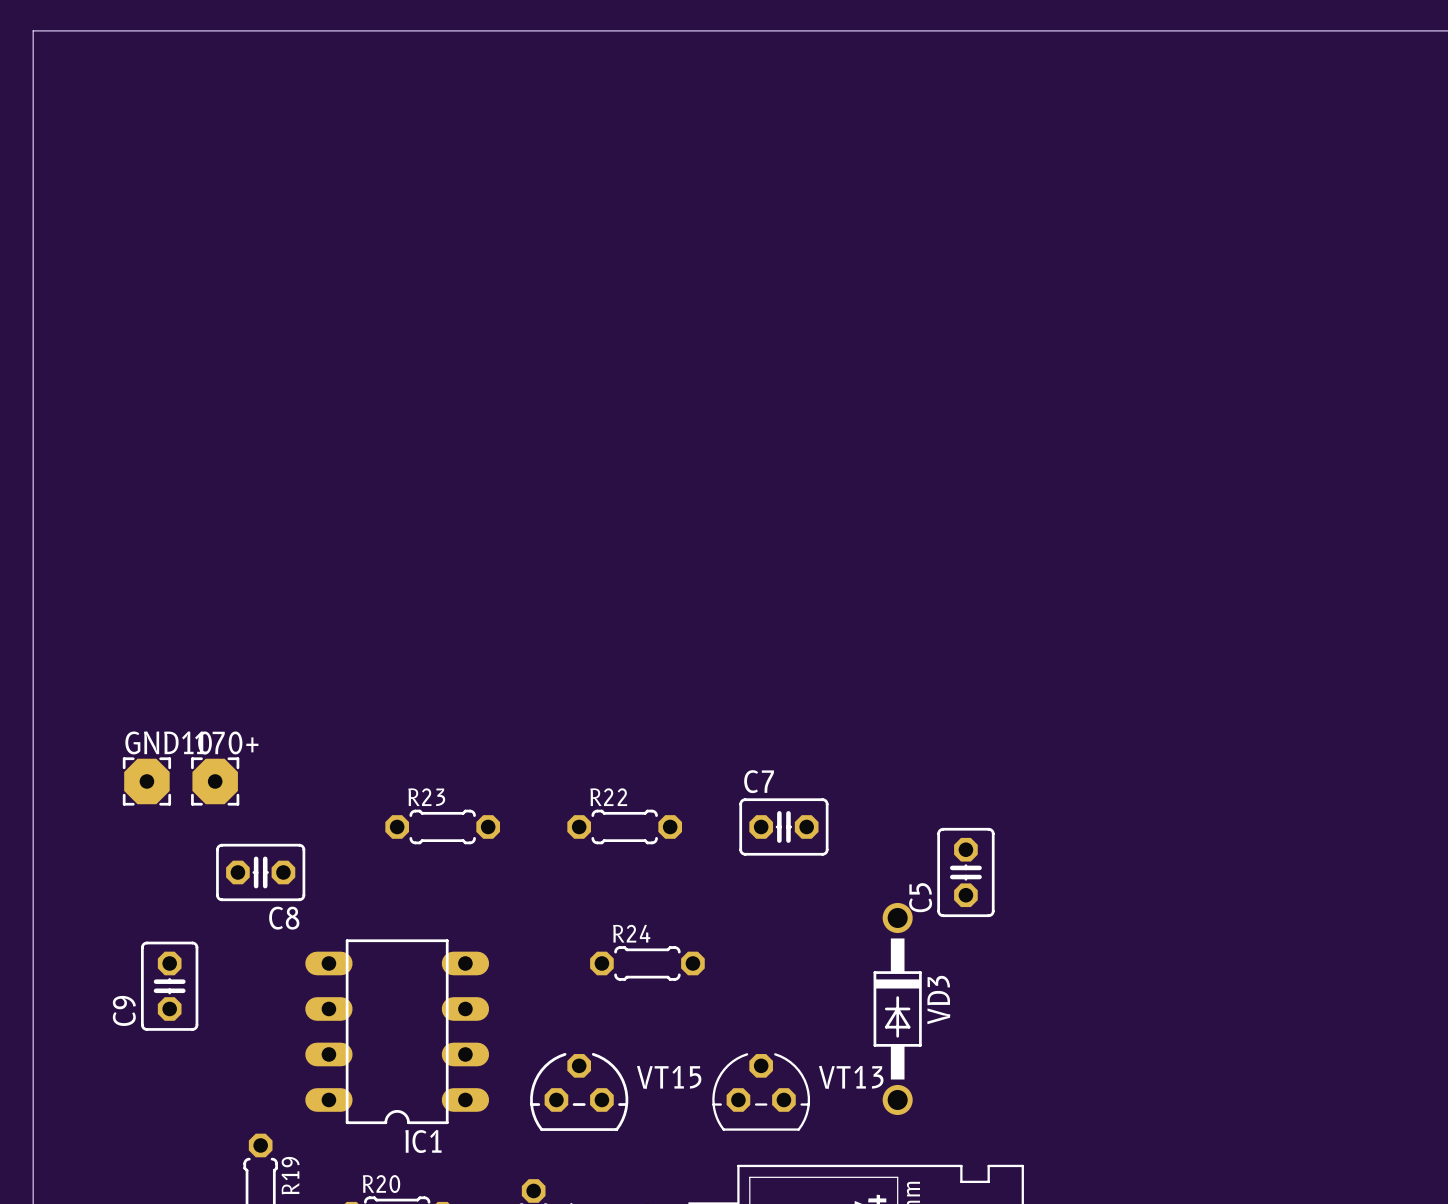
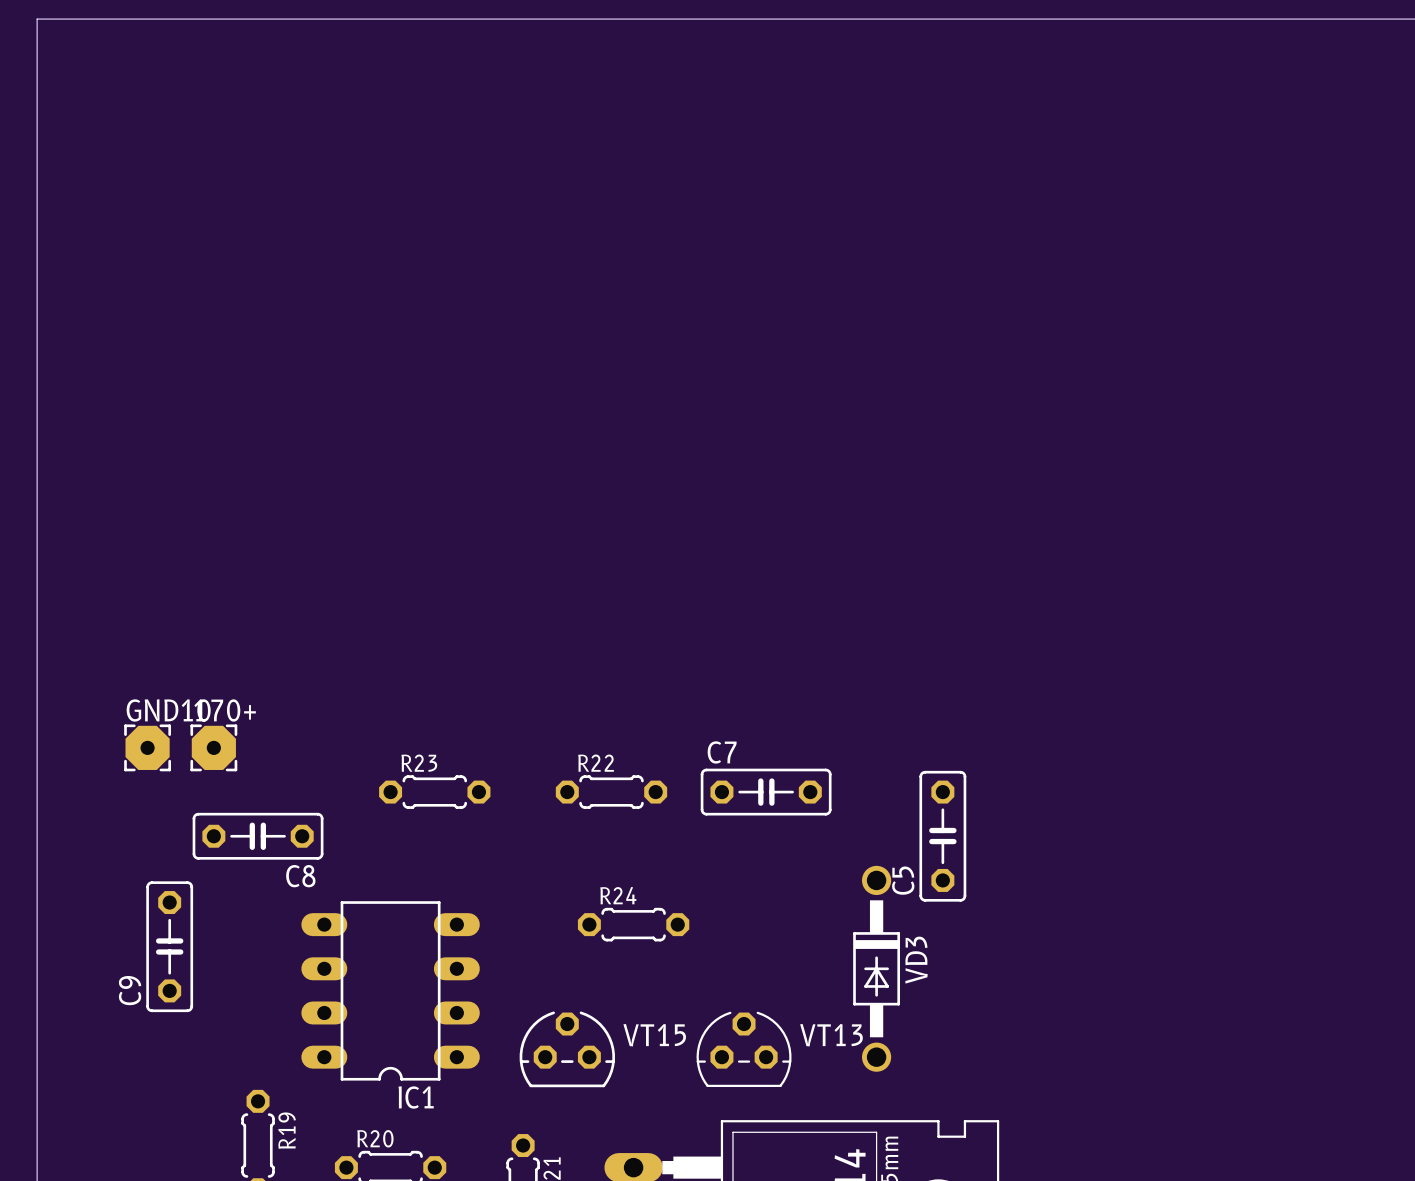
C7 footprint: [739, 798, 829, 856] -> [700, 768, 832, 816]
C5 footprint: [937, 827, 995, 918] -> [919, 770, 967, 902]
C8 footprint: [216, 843, 306, 902] -> [192, 812, 324, 860]
C9 footprint: [141, 941, 199, 1031] -> [146, 881, 194, 1013]

